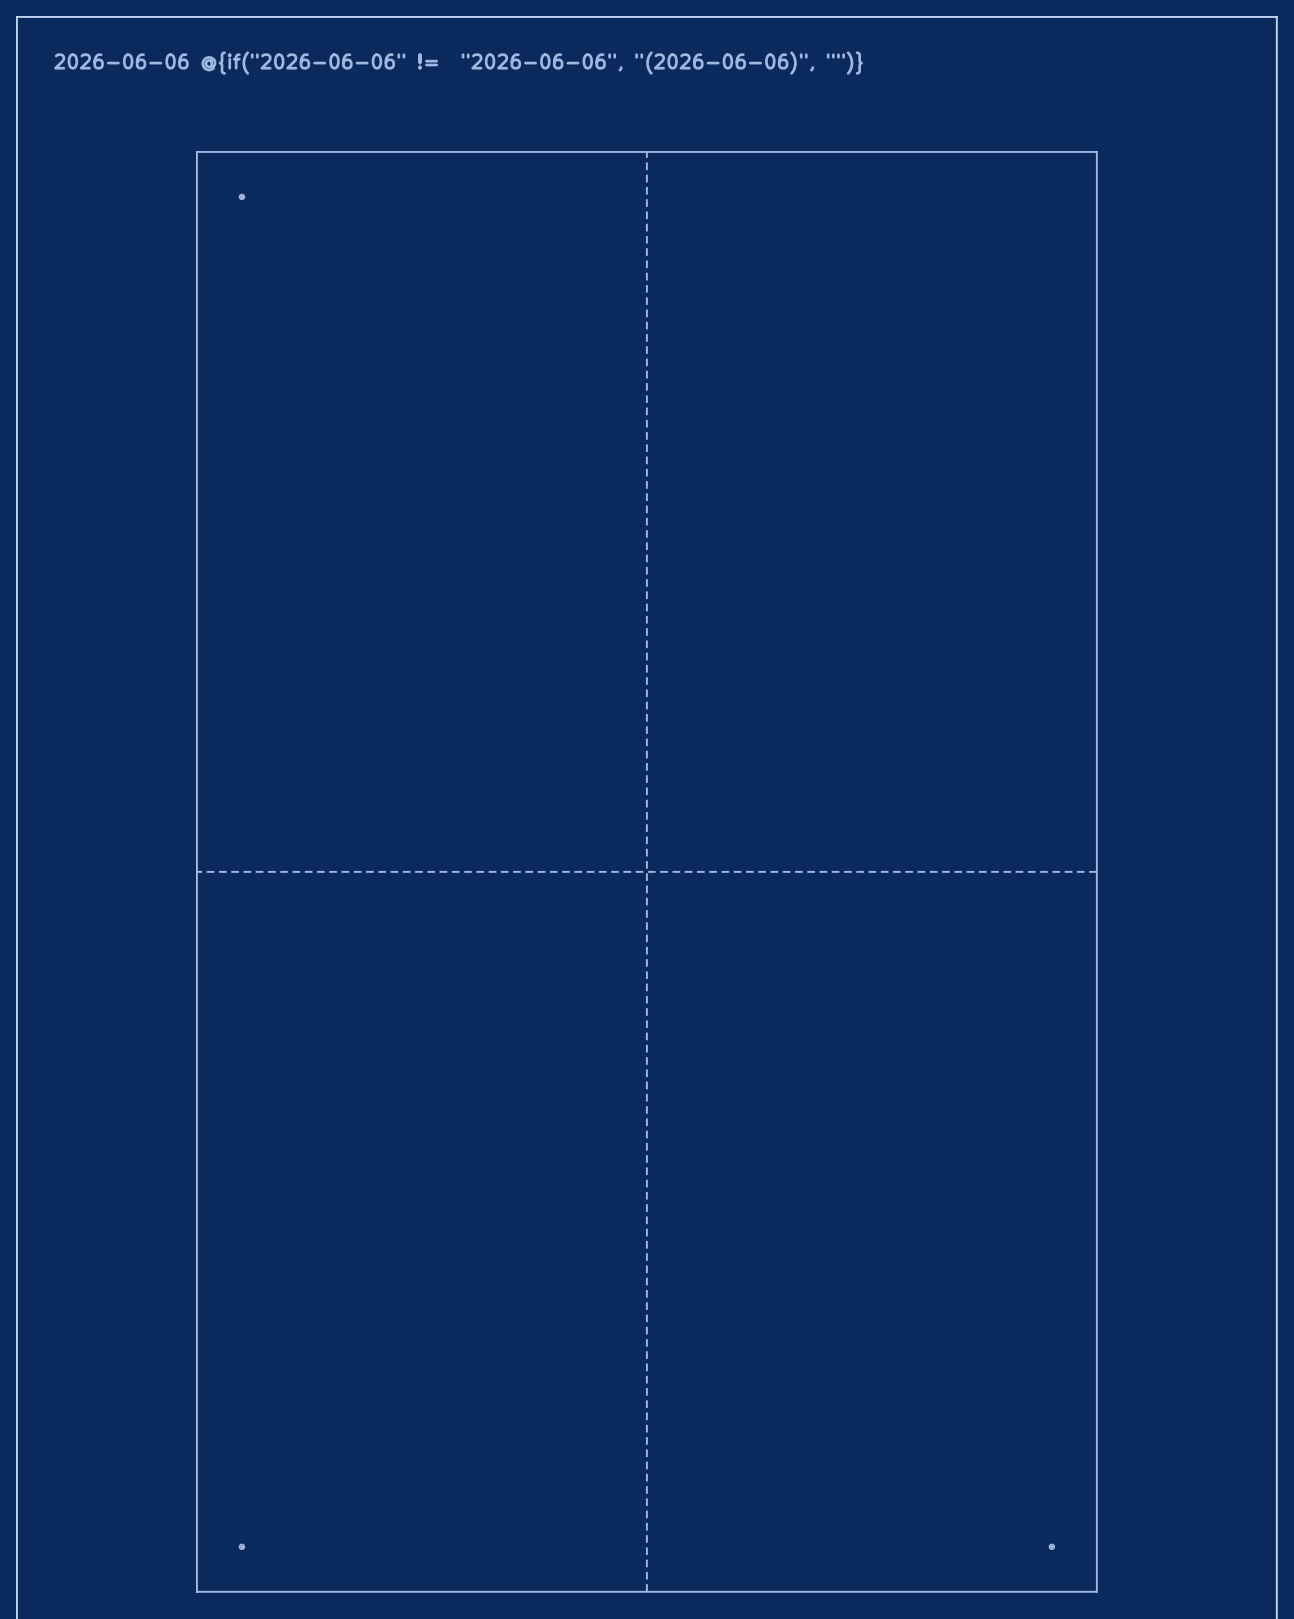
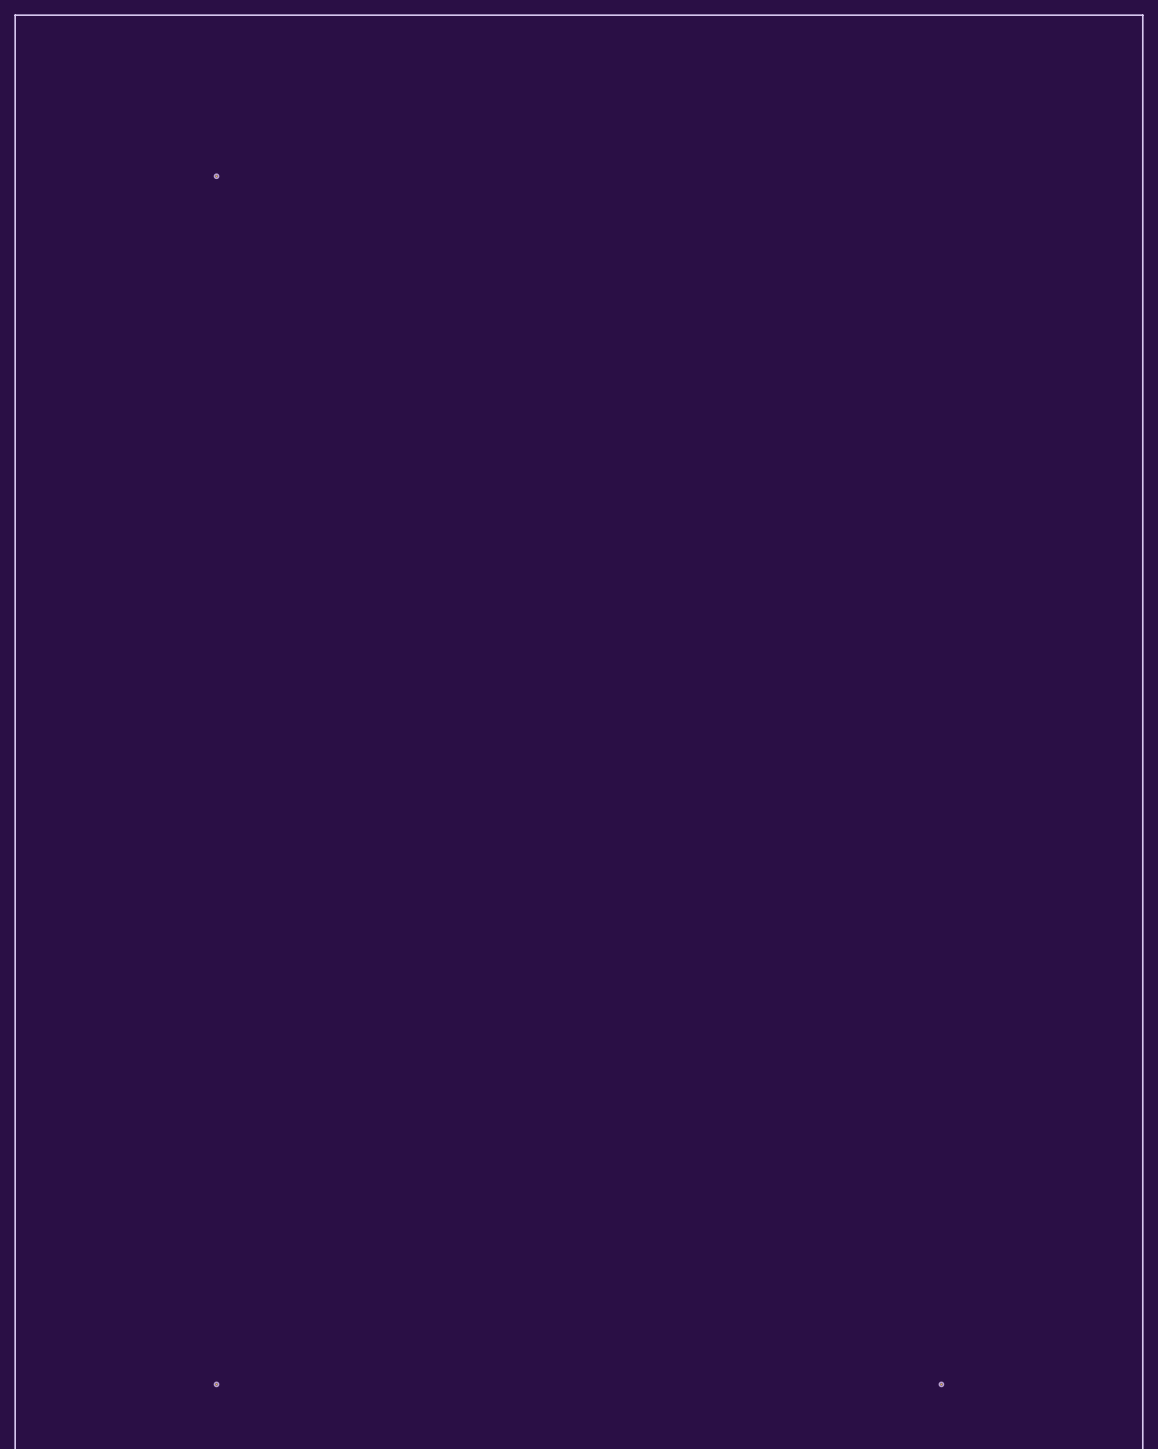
text: 2026-06-06 @{if("2026-06-06" != "2026-06-06", "(2026-06-06)", "")} (458, 63) -> none
line: (196, 151) (1096, 151) (1096, 1591) (196, 1591) (196, 151) -> none
line: (646, 151) (646, 1591) -> none
line: (196, 871) (1096, 871) -> none

